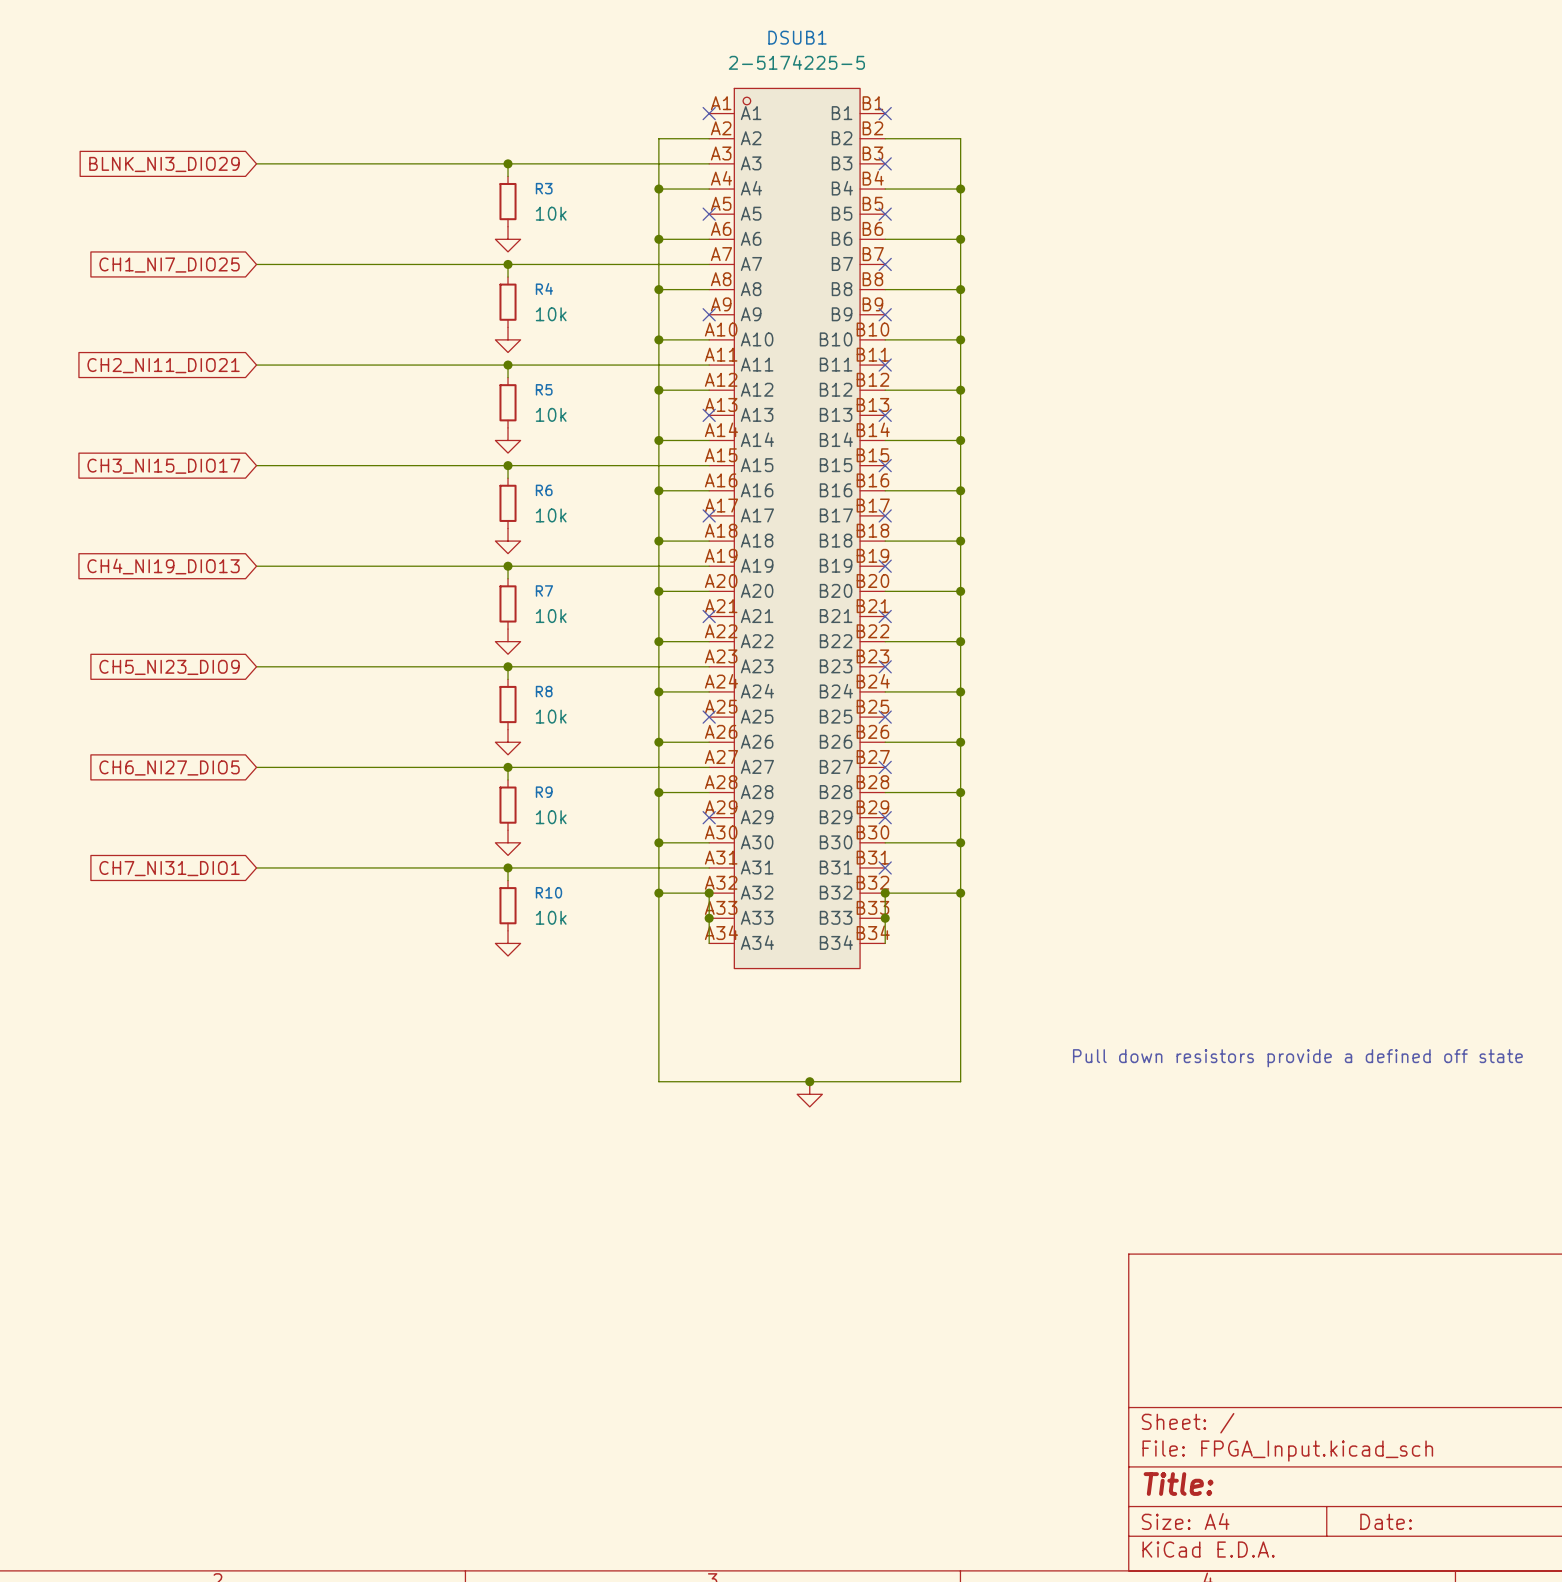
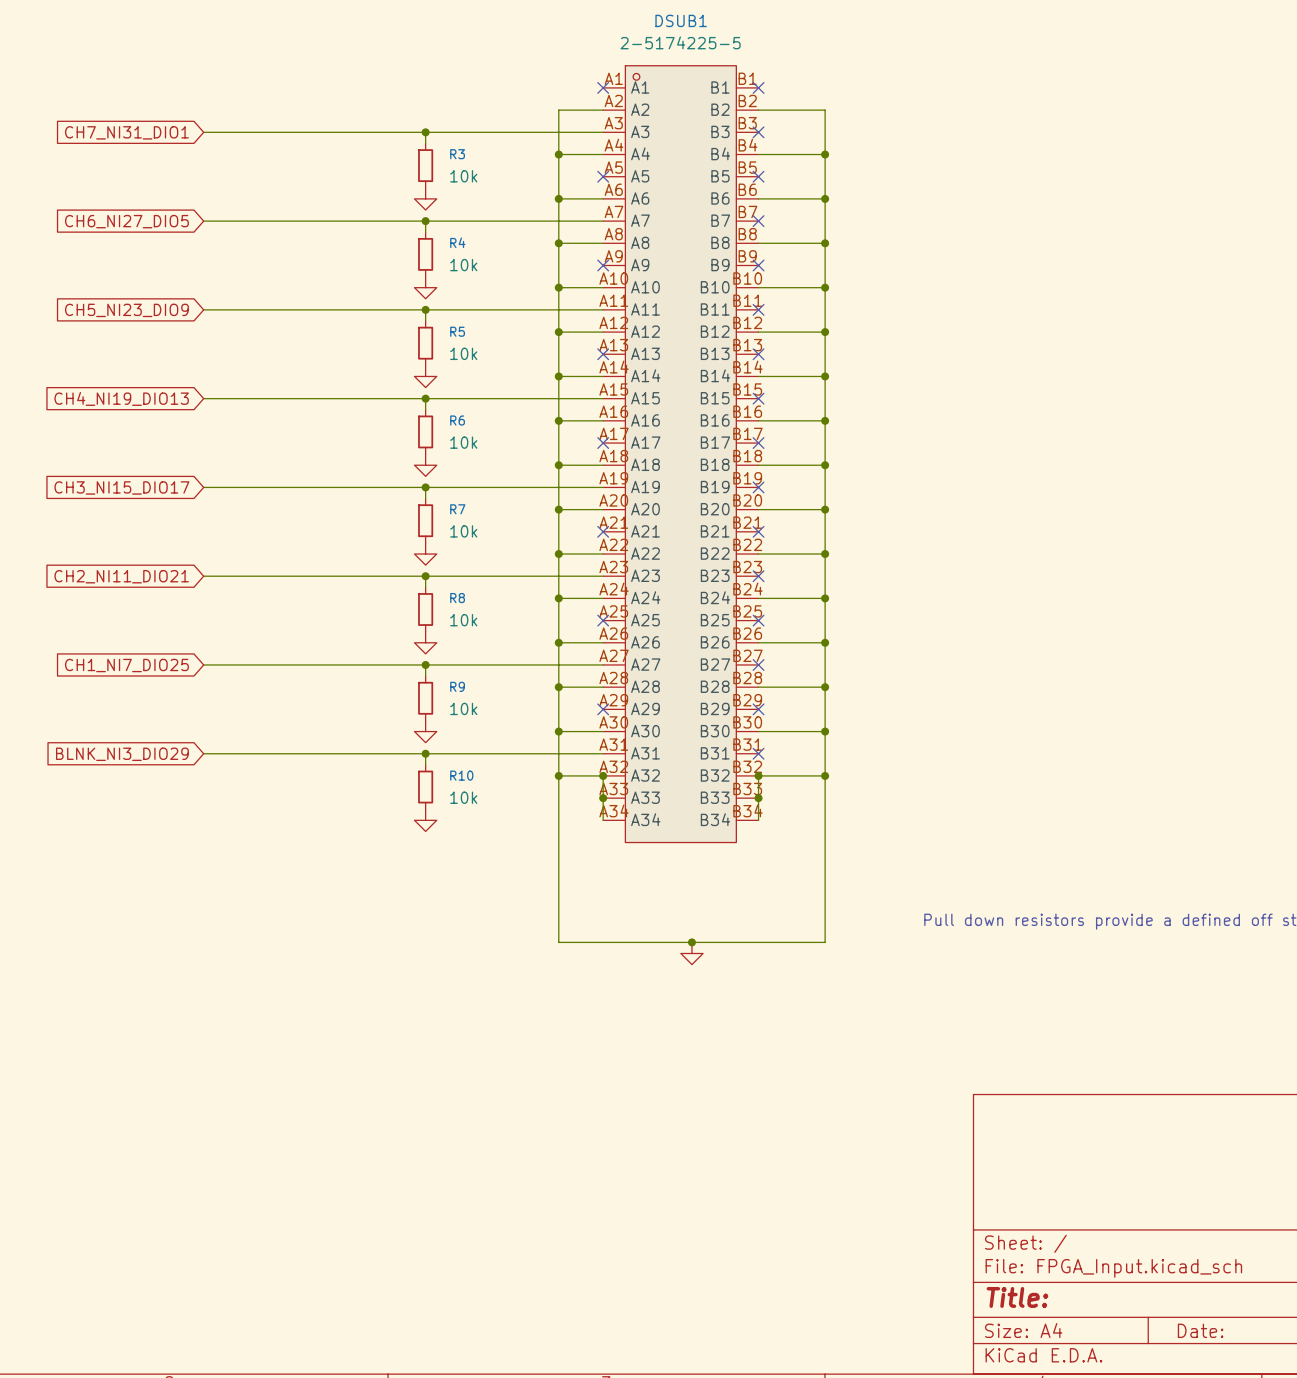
global label: BLNK_NI3_DIO29 (164, 164) -> CH7_NI31_DIO1 (126, 132)
global label: CH1_NI7_DIO25 (169, 265) -> CH6_NI27_DIO5 (126, 221)
global label: CH2_NI11_DIO21 (163, 365) -> CH5_NI23_DIO9 (126, 310)
global label: CH3_NI15_DIO17 (163, 466) -> CH4_NI19_DIO13 (121, 398)
global label: CH4_NI19_DIO13 (163, 566) -> CH3_NI15_DIO17 (121, 487)
global label: CH5_NI23_DIO9 (169, 667) -> CH2_NI11_DIO21 (121, 576)
global label: CH6_NI27_DIO5 (169, 767) -> CH1_NI7_DIO25 (126, 665)
global label: CH7_NI31_DIO1 (169, 868) -> BLNK_NI3_DIO29 (122, 754)

